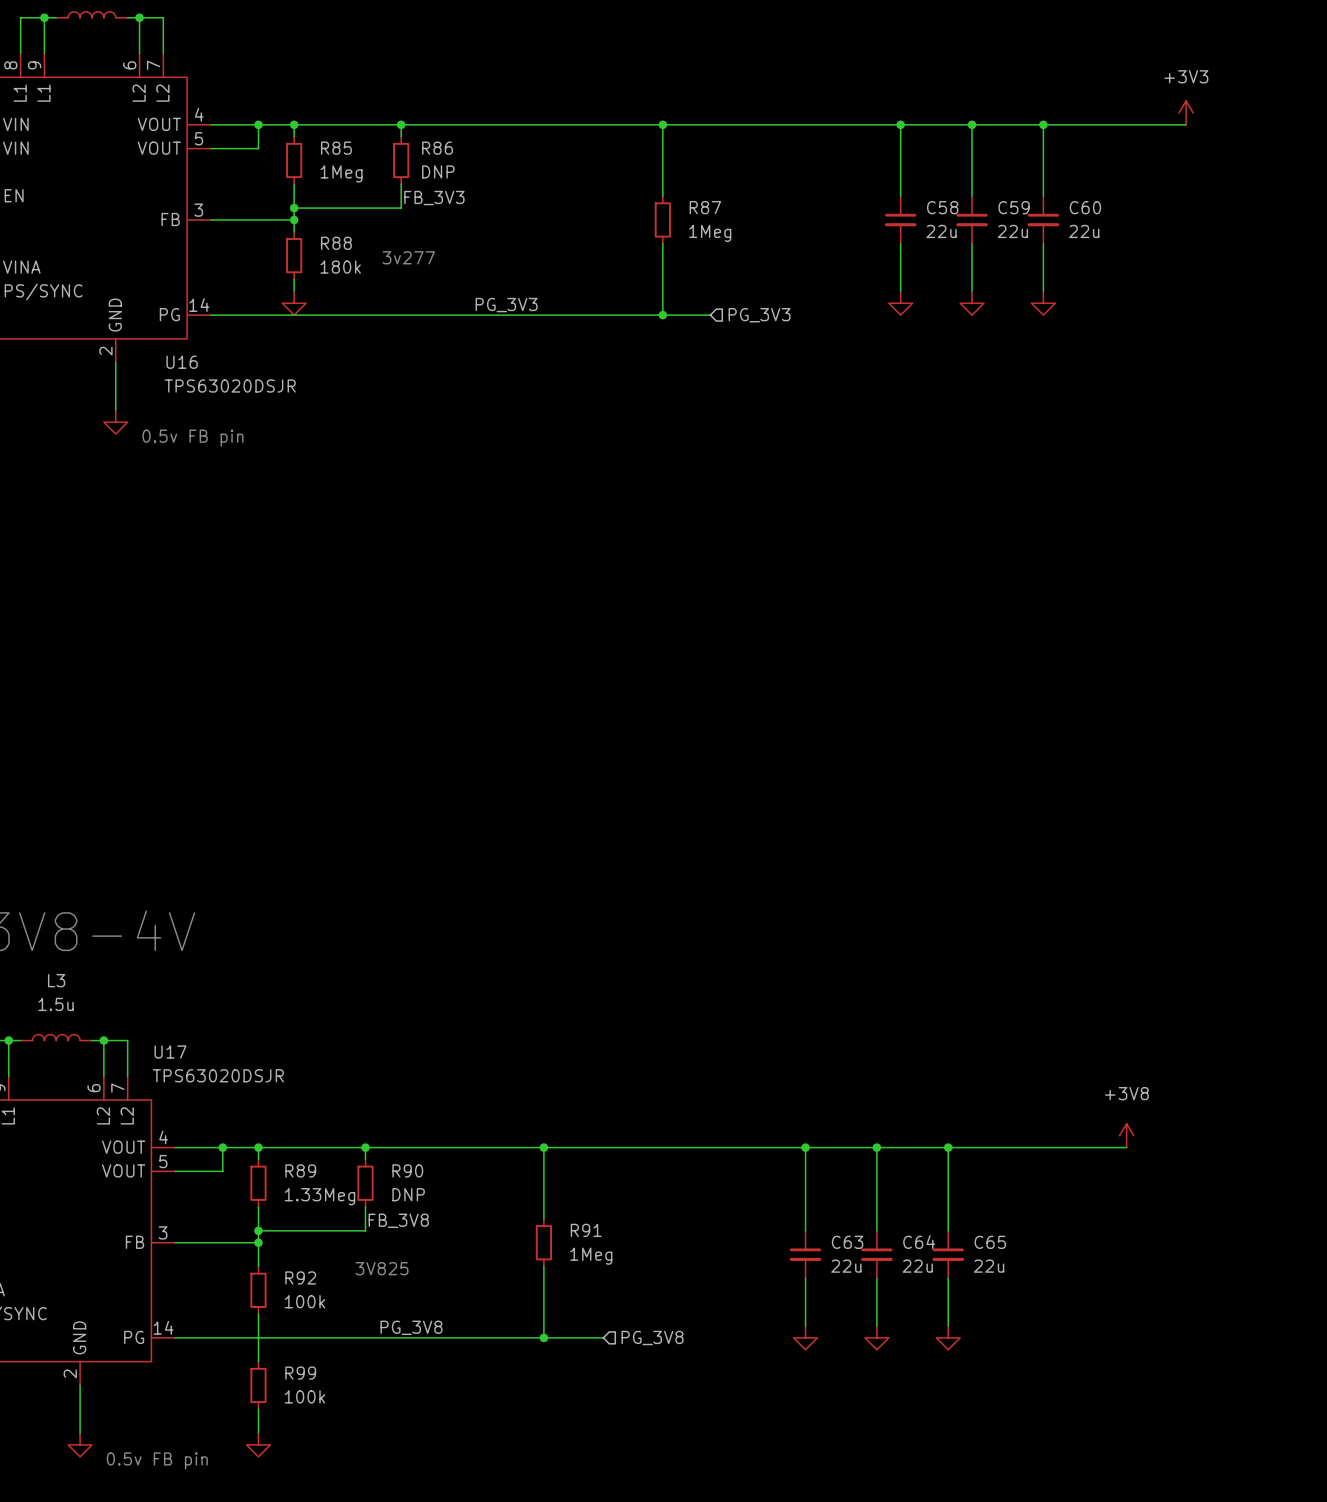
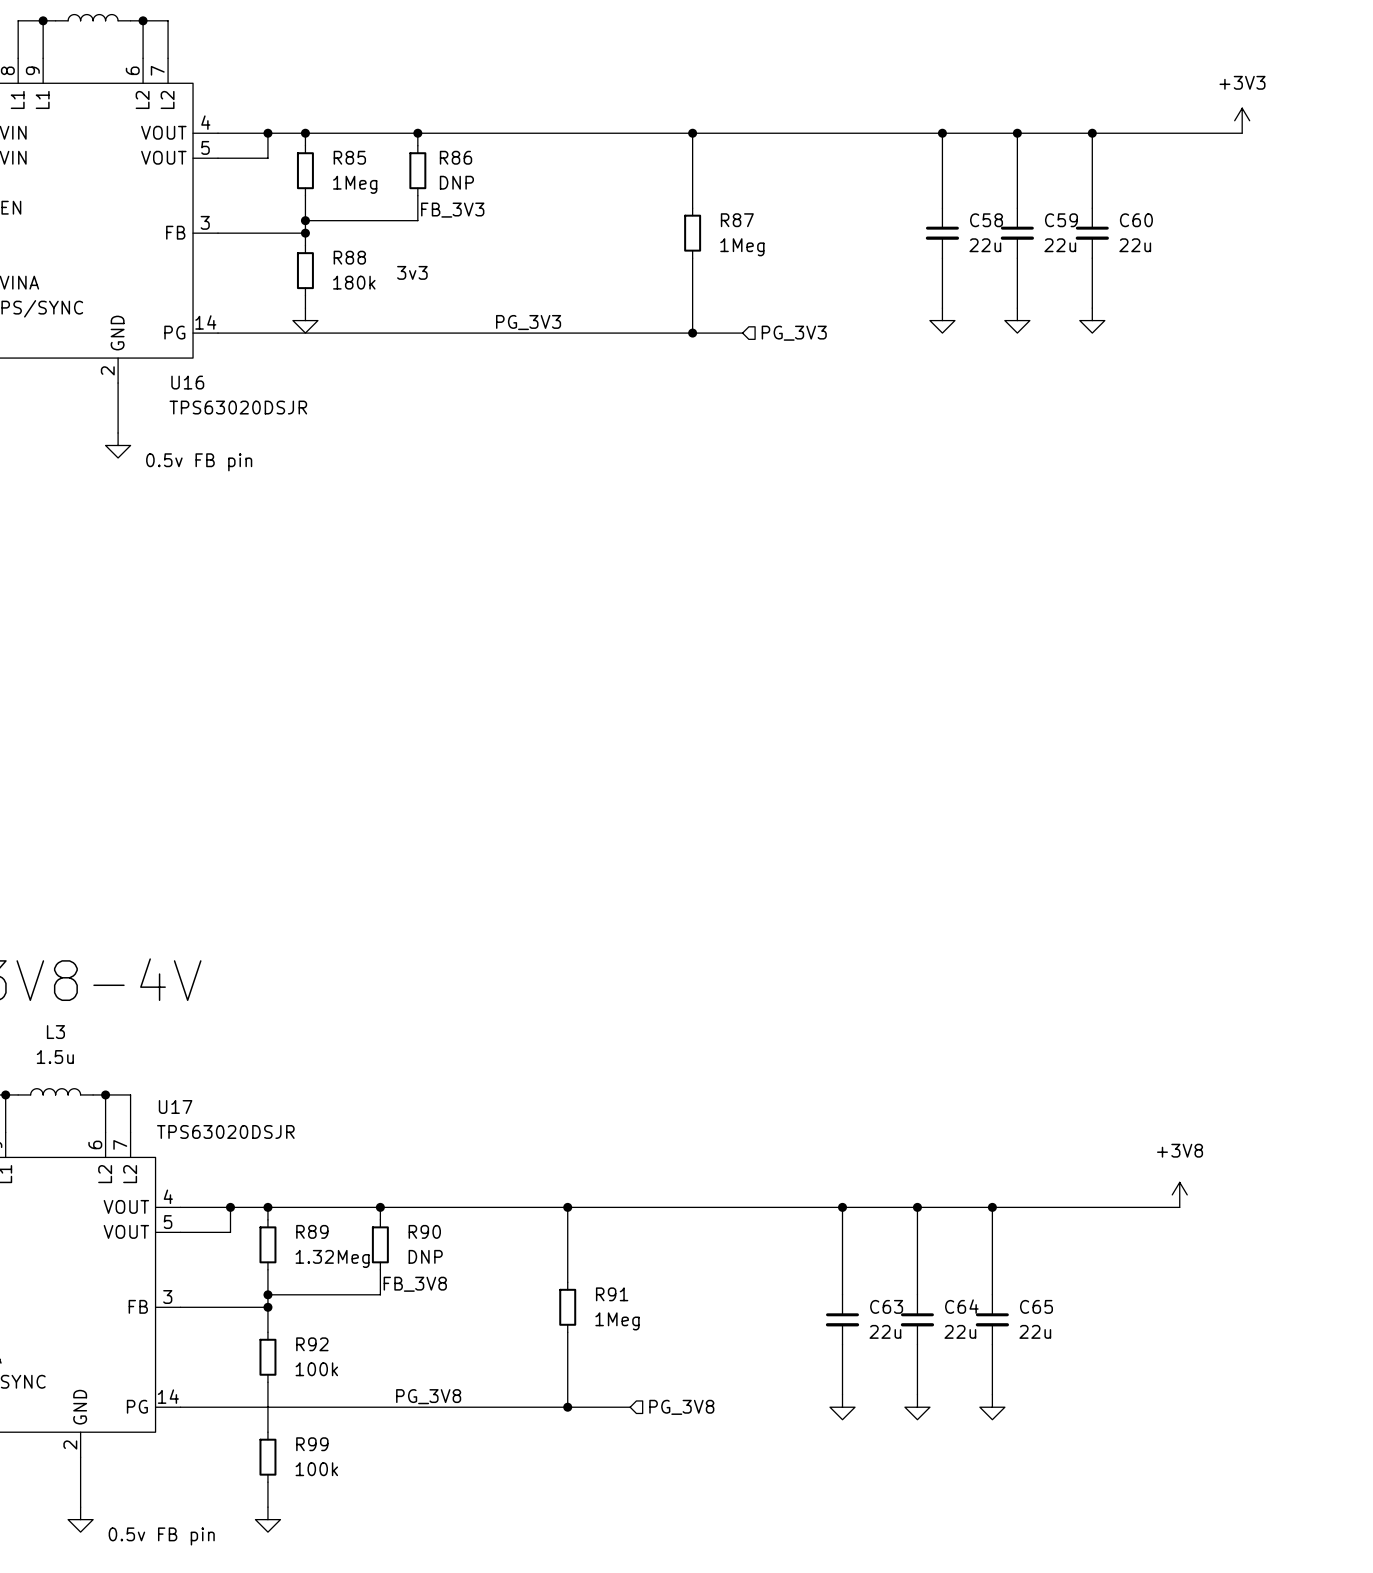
text: none -> 3v3 (412, 272)
text: 3v277 (408, 257) -> none
R89 value: 1.33Meg (320, 1196) -> 1.32Meg (332, 1258)
text: 3V825 (382, 1268) -> none

